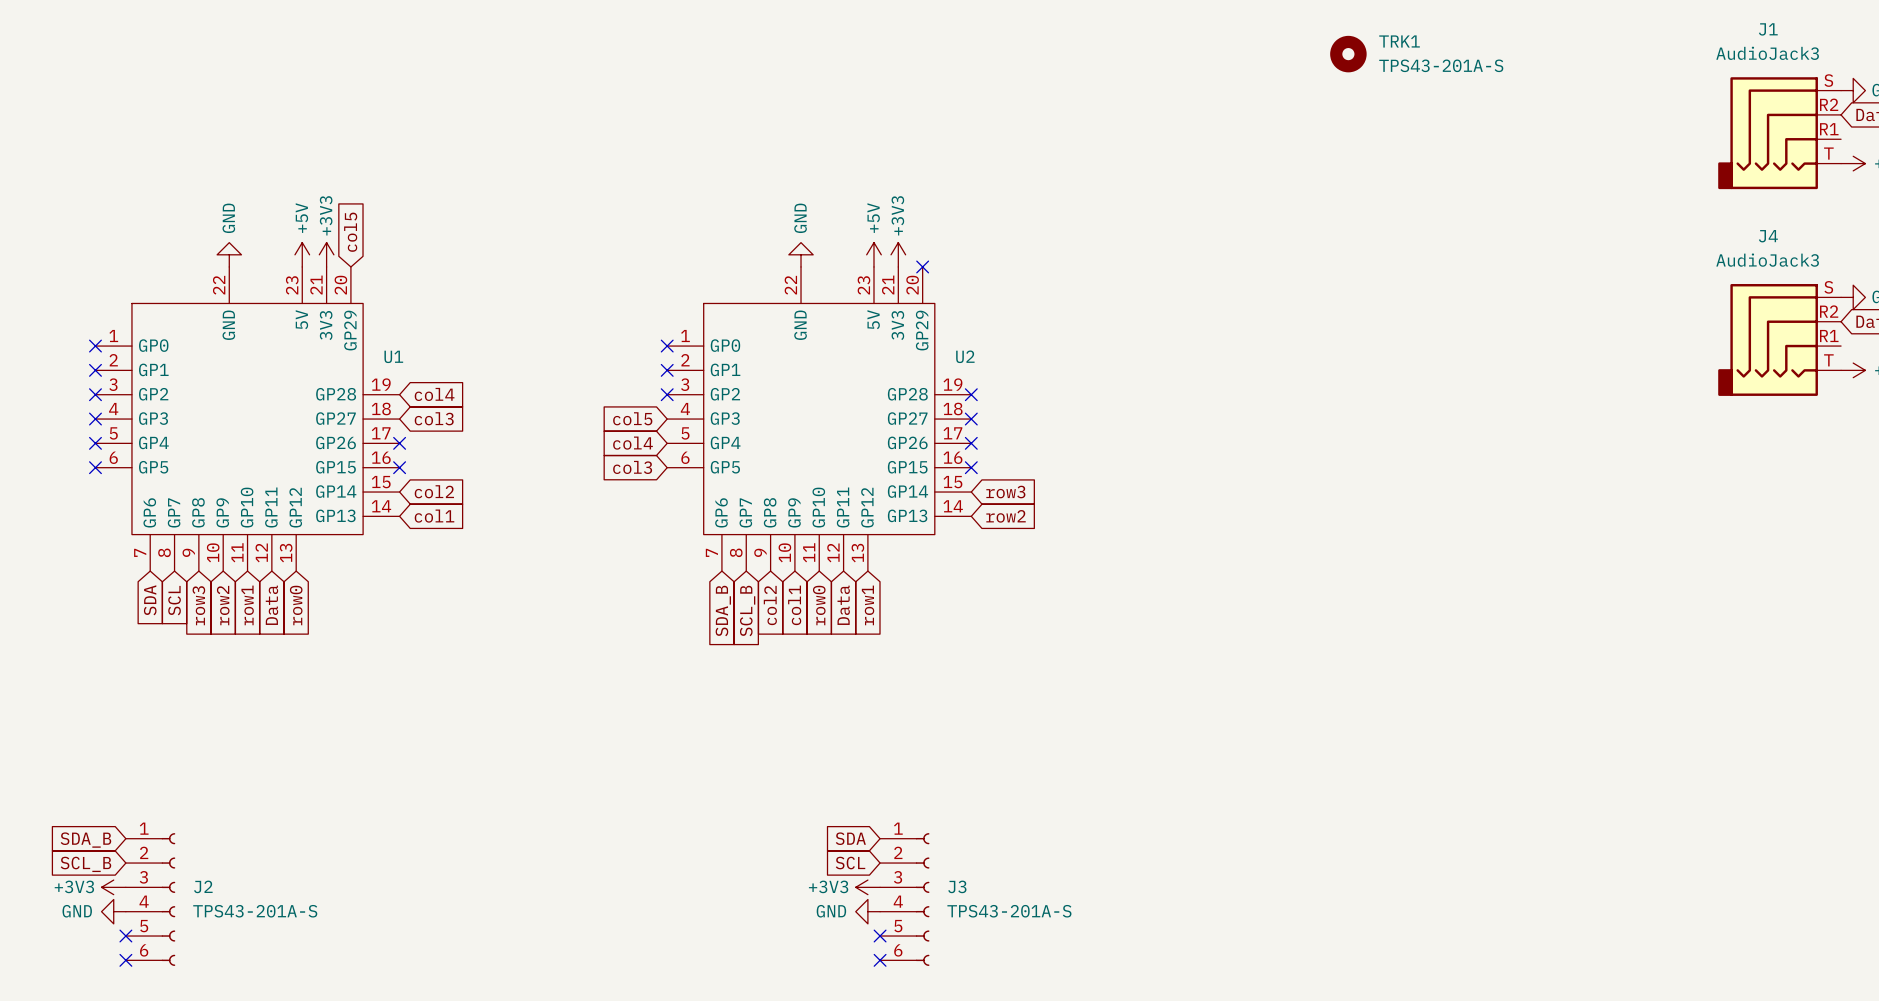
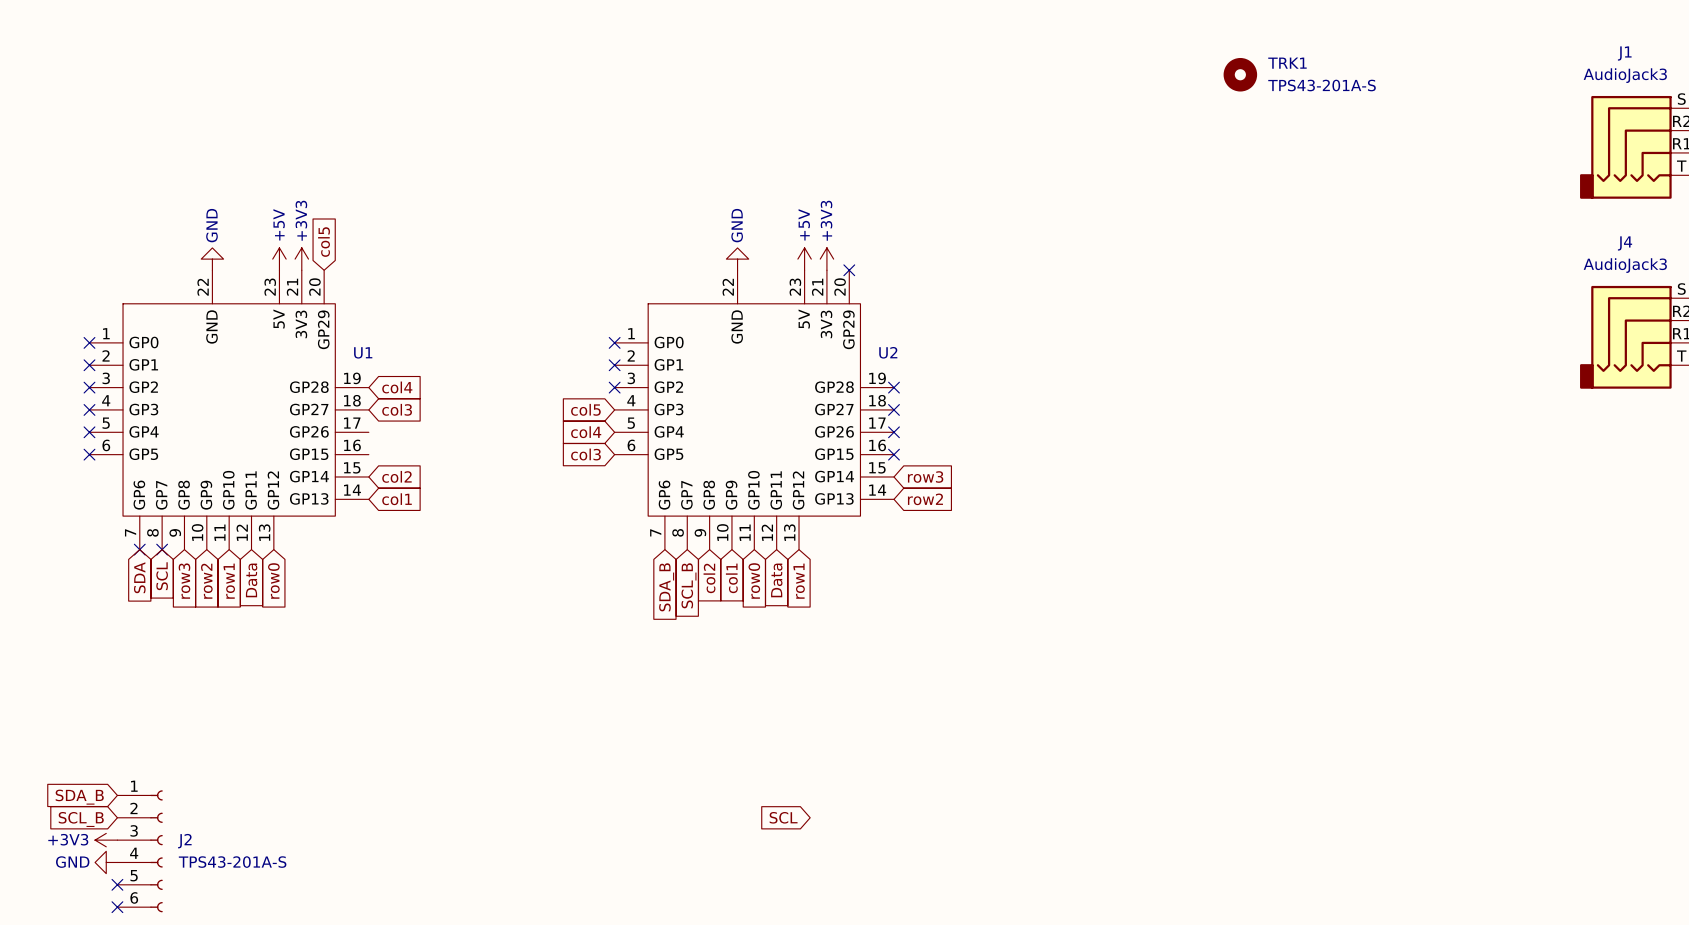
no-connect mark: (399, 443) -> none
no-connect mark: (399, 467) -> none
no-connect mark: none -> (139, 549)
no-connect mark: none -> (162, 549)
global label: SDA (850, 838) -> none
power symbol: +3V3 (867, 887) -> none
J3: TPS43-201A-S (904, 899) -> none
power symbol: GND (867, 911) -> none
no-connect mark: (880, 936) -> none
no-connect mark: (880, 960) -> none

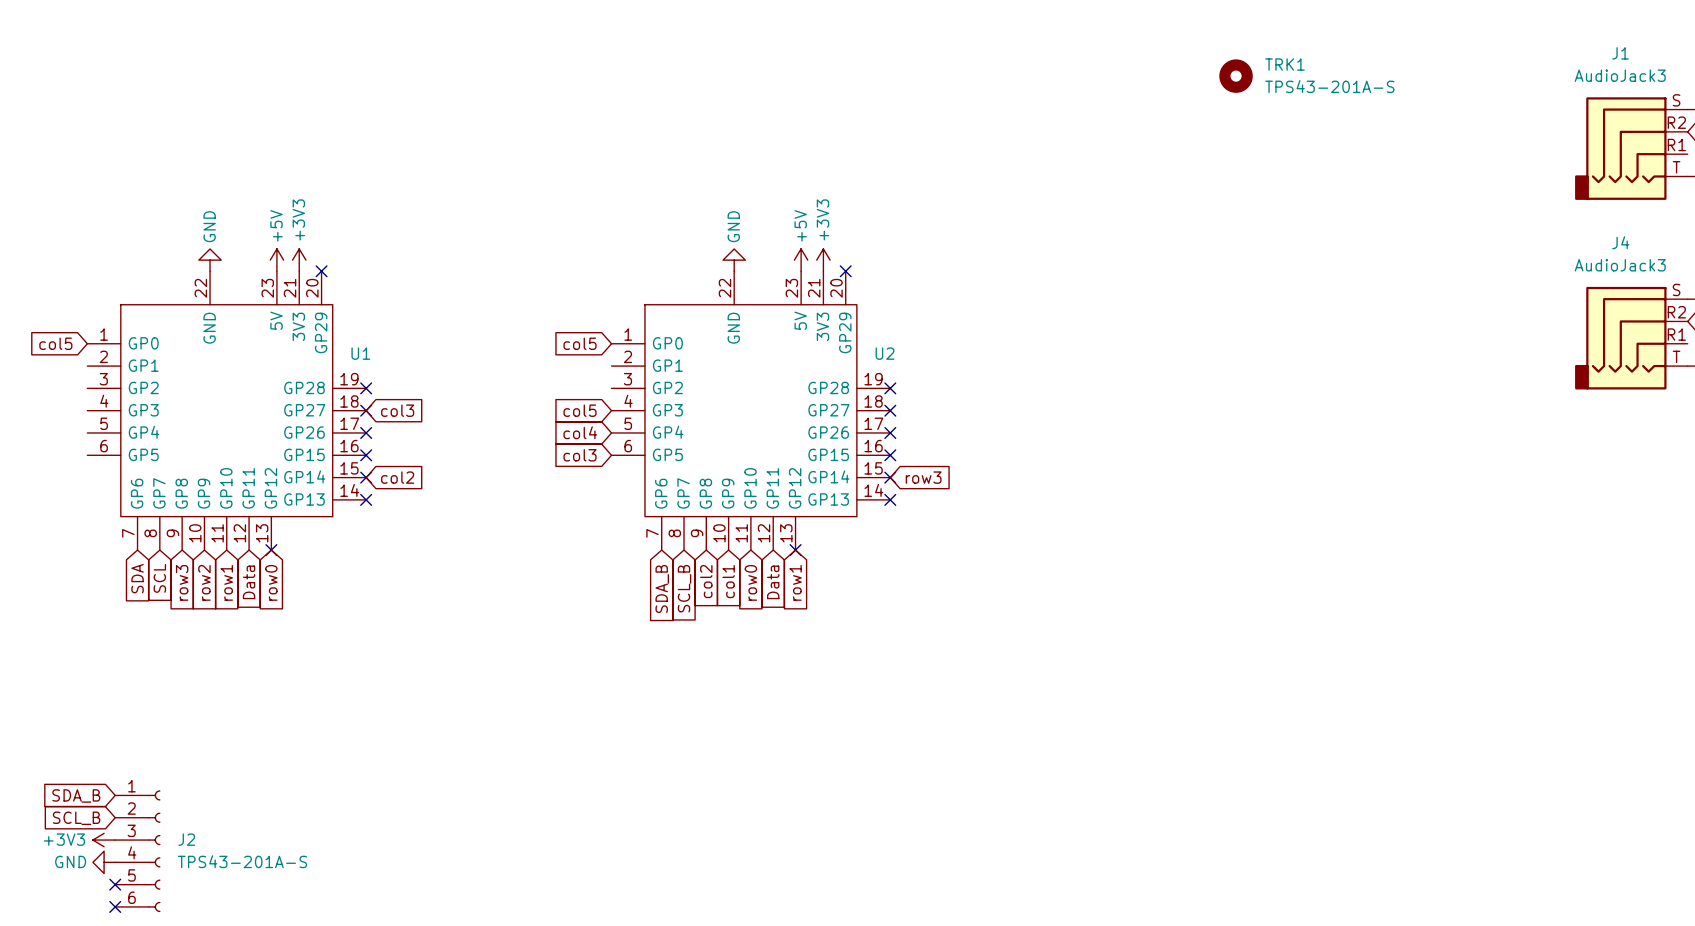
global label: col5 (324, 242) -> none
no-connect mark: none -> (321, 271)
global label: none -> col5 (55, 343)
no-connect mark: (89, 342) -> none
global label: none -> col5 (580, 343)
no-connect mark: (614, 342) -> none
no-connect mark: (89, 365) -> none
no-connect mark: (614, 365) -> none
no-connect mark: (89, 387) -> none
no-connect mark: none -> (366, 388)
global label: col4 (397, 387) -> none
no-connect mark: (614, 387) -> none
no-connect mark: (89, 409) -> none
no-connect mark: none -> (366, 410)
no-connect mark: (89, 432) -> none
no-connect mark: none -> (366, 432)
no-connect mark: (89, 454) -> none
no-connect mark: none -> (366, 455)
no-connect mark: none -> (366, 477)
no-connect mark: none -> (890, 477)
no-connect mark: none -> (366, 499)
global label: col1 (397, 499) -> none
no-connect mark: none -> (890, 499)
global label: row2 (925, 499) -> none
no-connect mark: (139, 549) -> none
no-connect mark: (162, 549) -> none
no-connect mark: none -> (271, 550)
no-connect mark: none -> (795, 550)
global label: SCL (783, 817) -> none

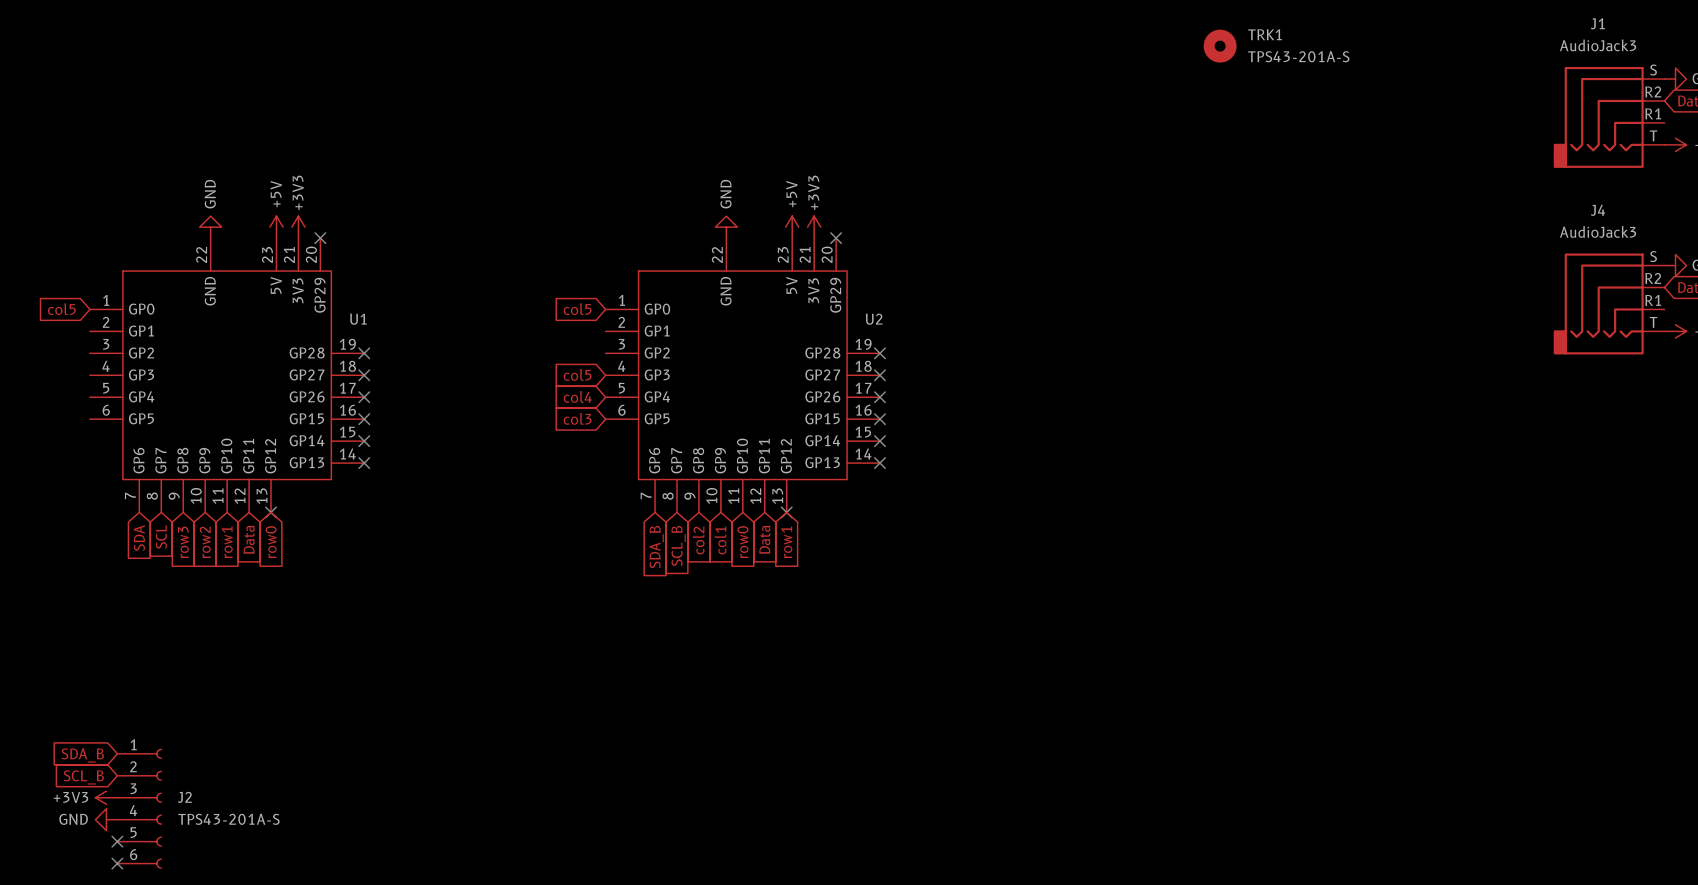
global label: col3 (397, 410) -> none
global label: col2 (397, 477) -> none
global label: row3 (923, 477) -> none

